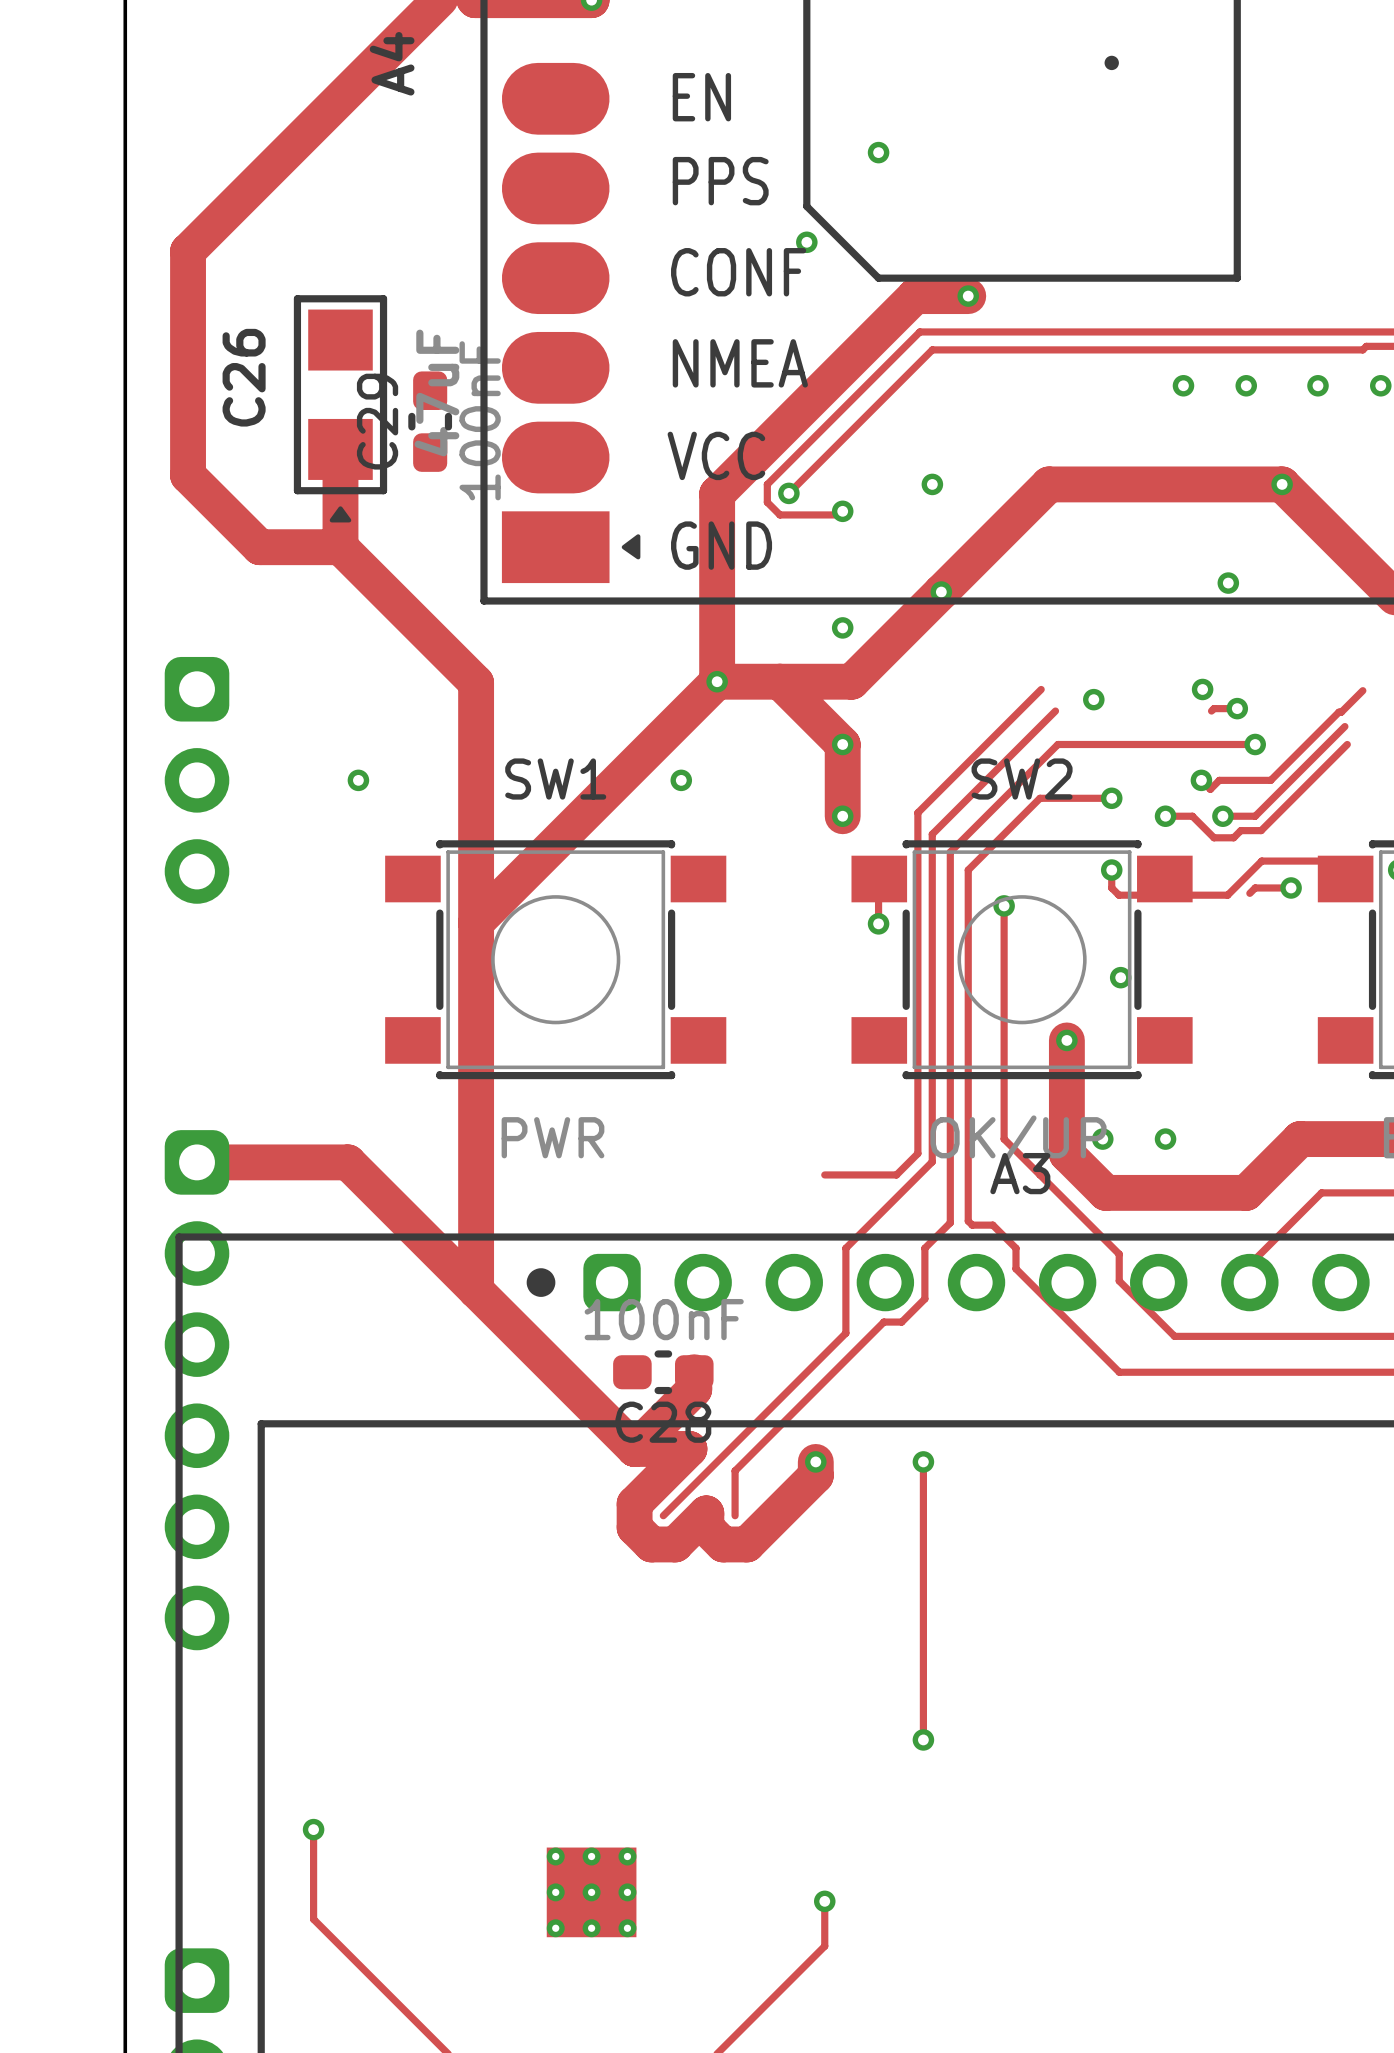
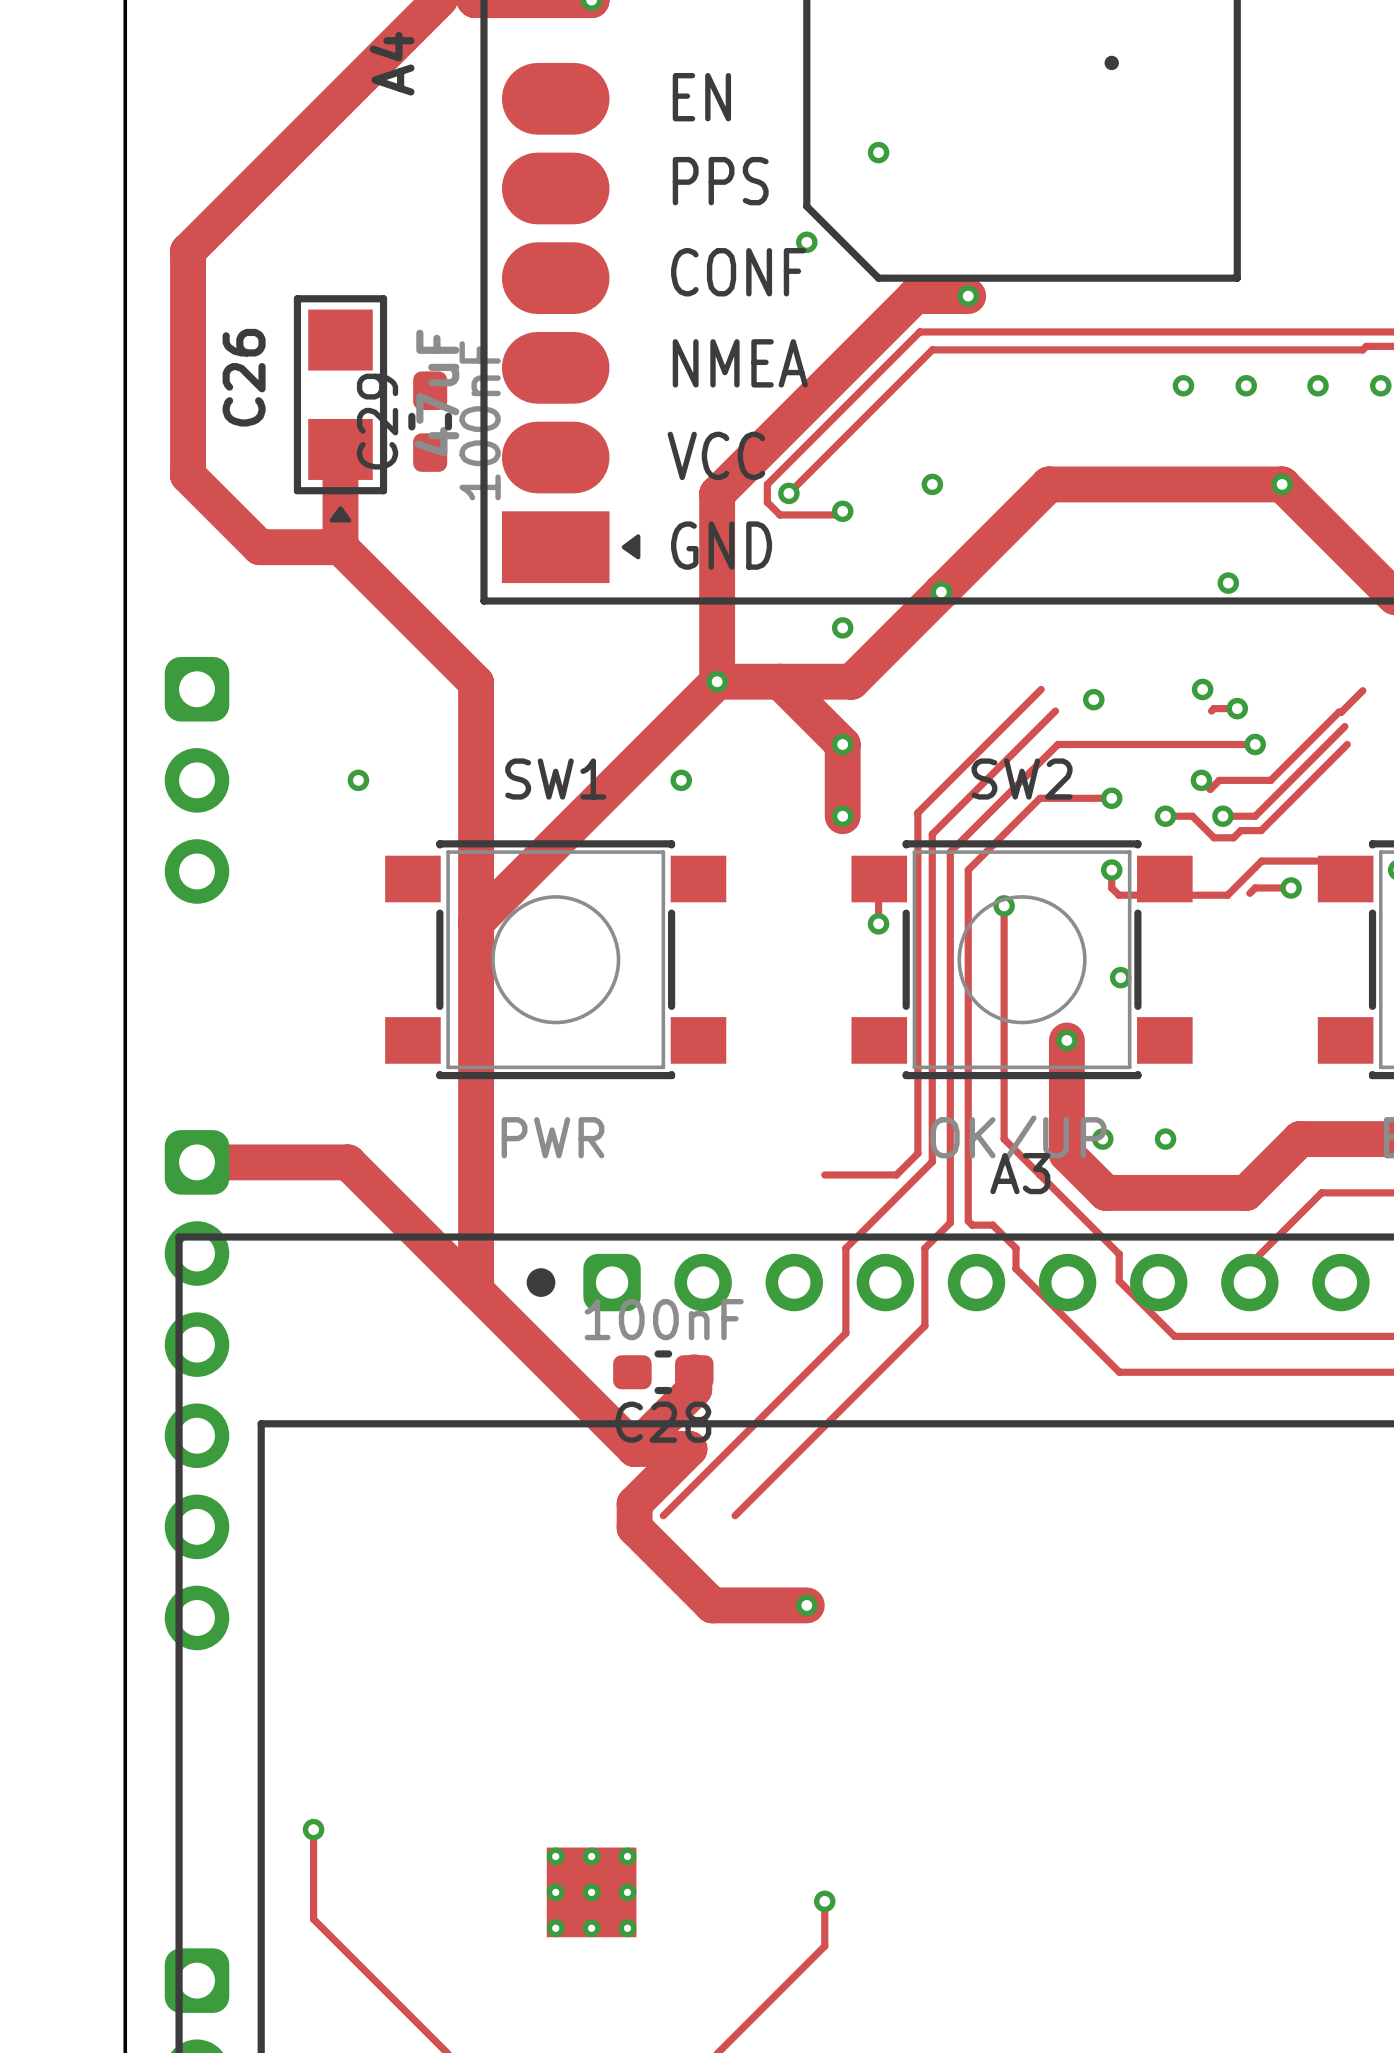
track: (924, 1298) (901, 1322) (883, 1322) (735, 1470) (735, 1515) -> (924, 1298) (924, 1325) (735, 1515)
track: (815, 1461) (815, 1475) (746, 1544) (723, 1544) (706, 1527) (706, 1513) (675, 1544) (651, 1544) -> (806, 1605) (712, 1605) (651, 1544)
via: (815, 1461) -> none
track: (923, 1461) (923, 1739) -> none
via: (923, 1461) -> none
via: none -> (806, 1605)
via: (923, 1739) -> none

